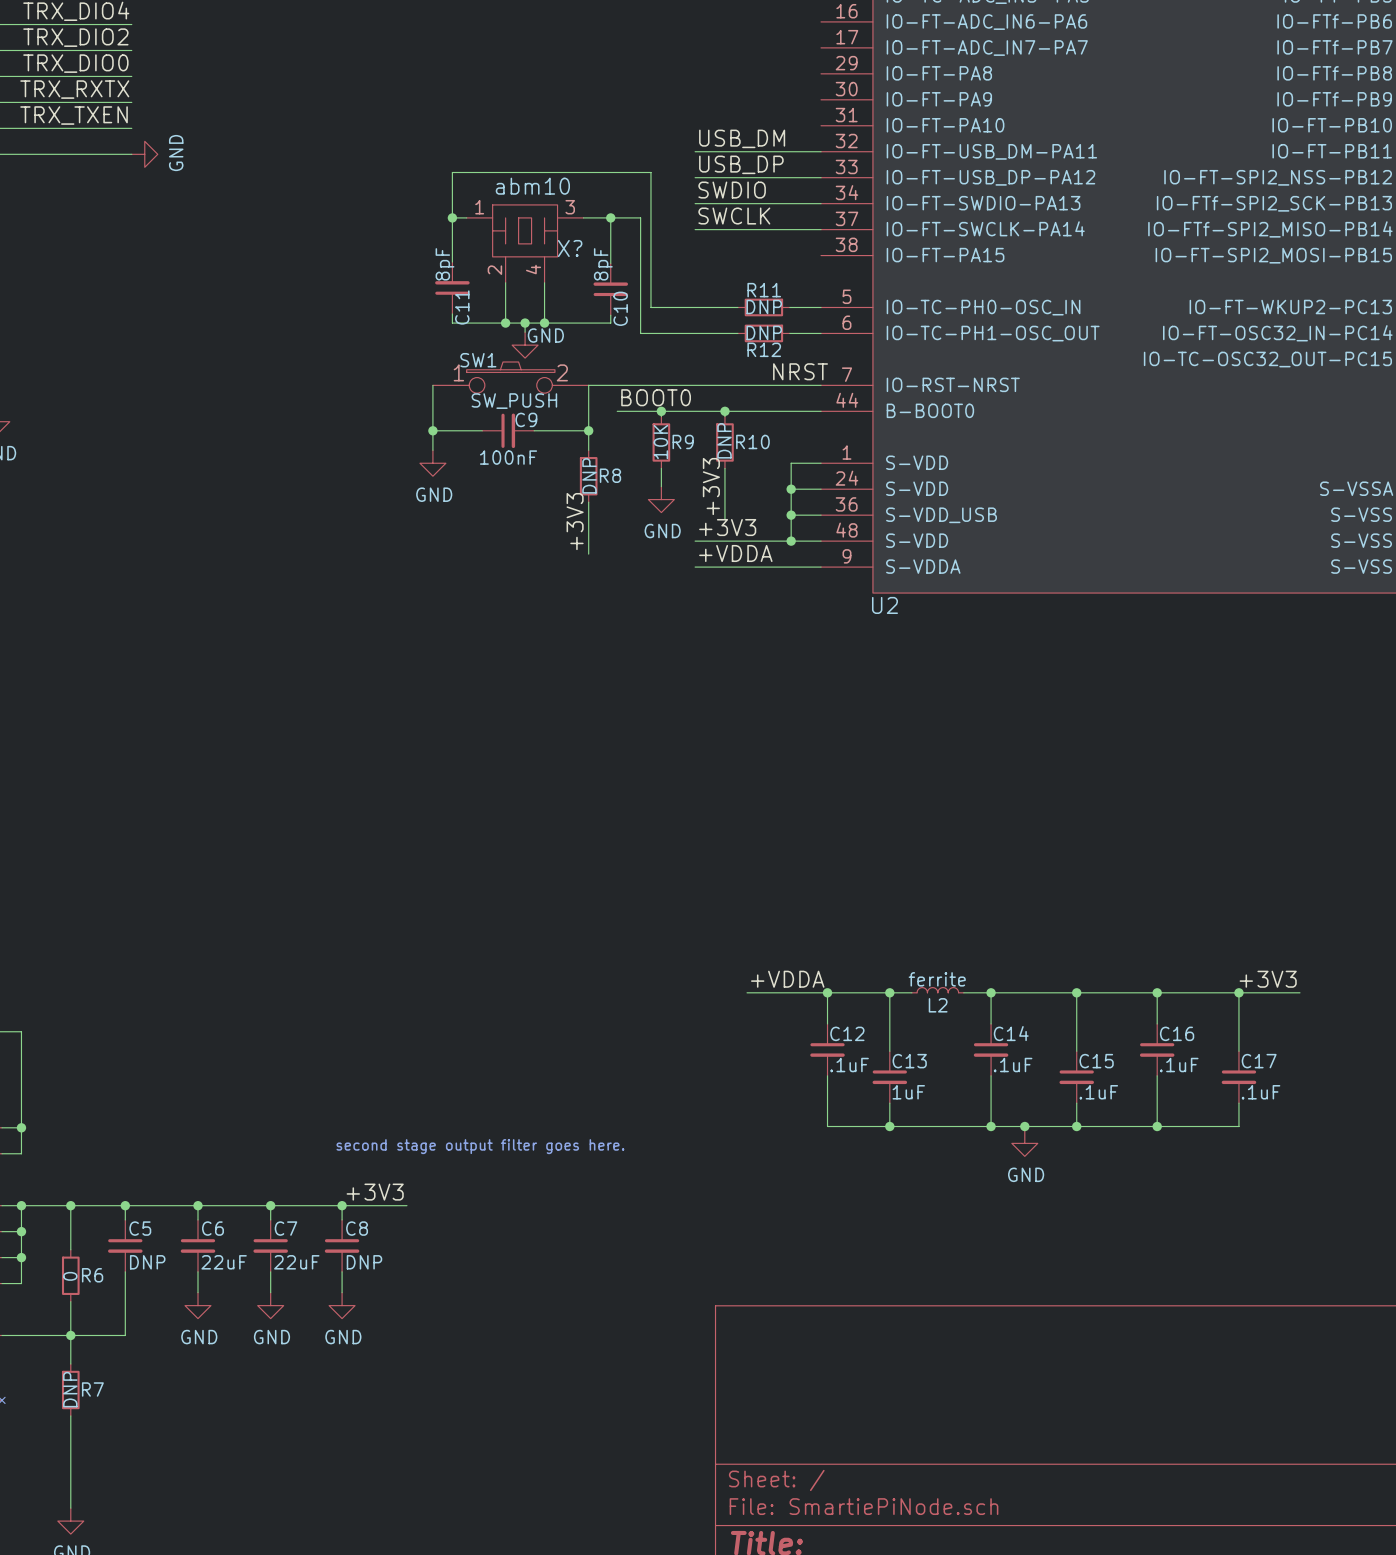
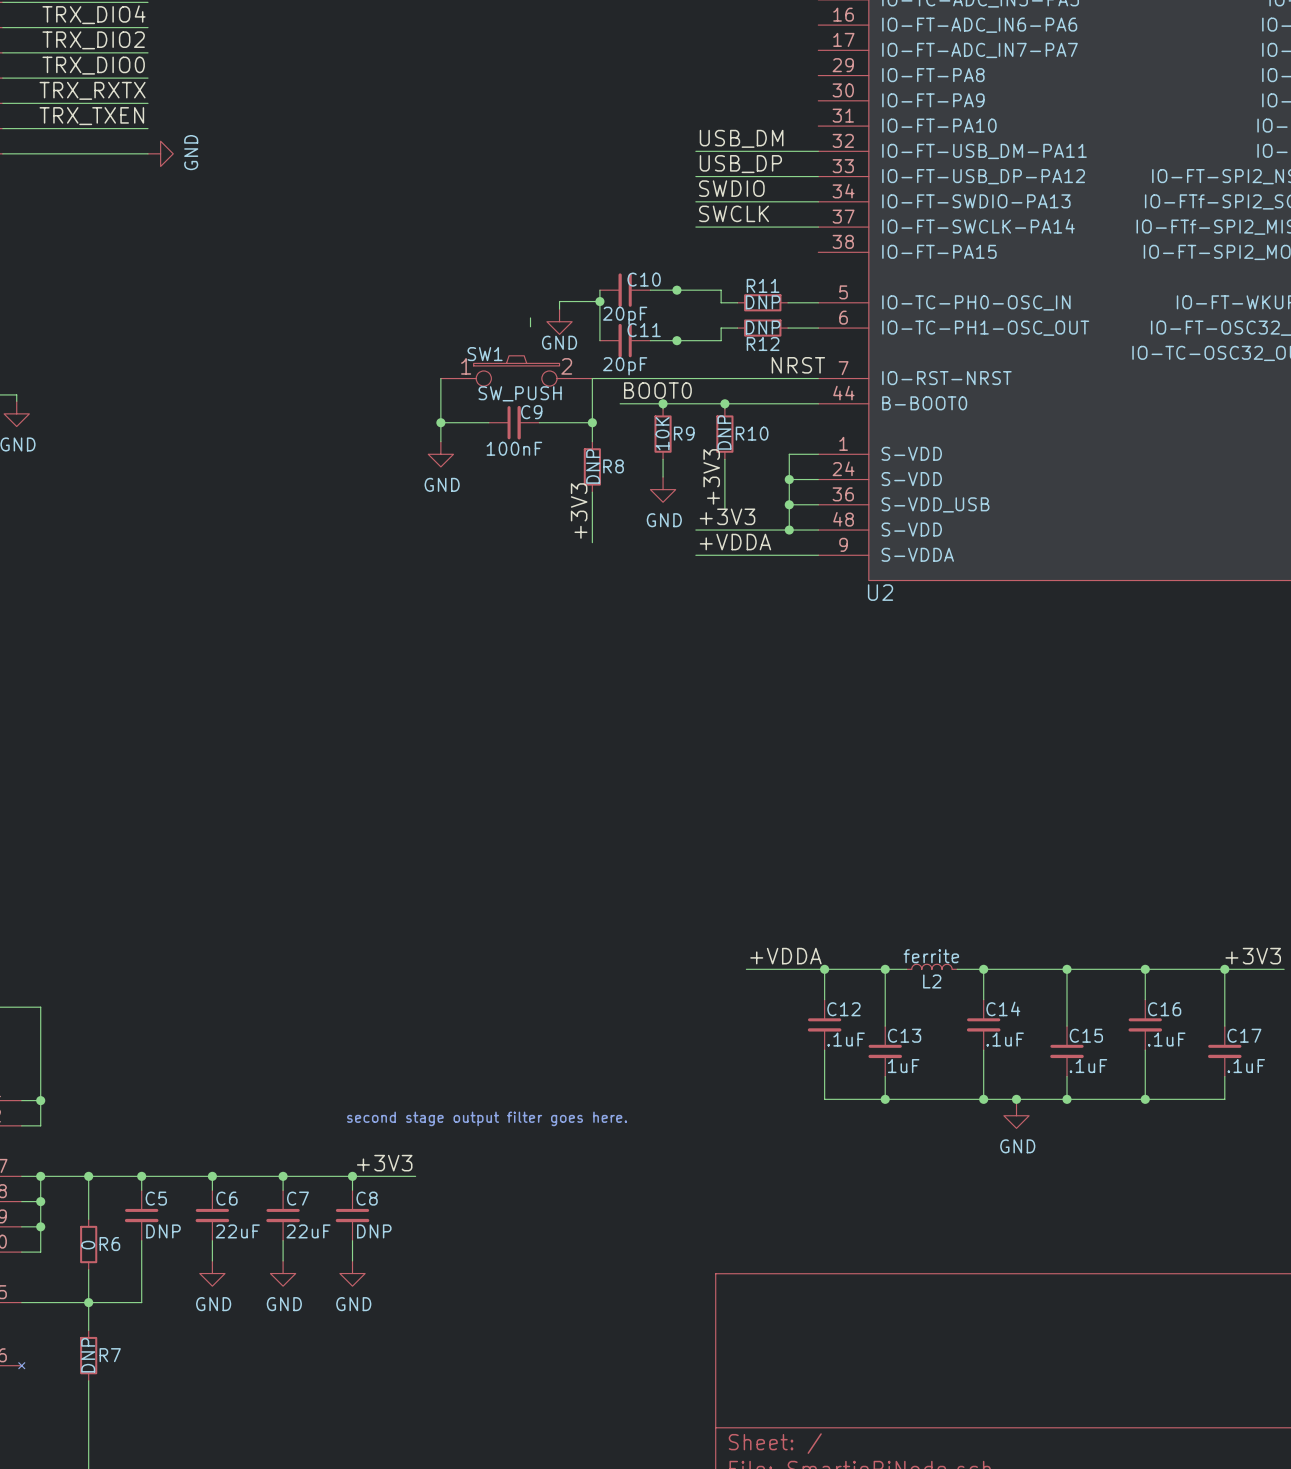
wire: (452, 217) (466, 217) -> none
junction: (452, 217) -> none
wire: (583, 217) (640, 217) (640, 333) (721, 333) -> (650, 340) (721, 340) (721, 328)
wire: (610, 217) (610, 263) -> none
junction: (610, 217) -> none
X?: abm10 (525, 243) -> none
wire: (452, 262) (452, 172) (650, 172) (650, 307) (721, 307) -> (650, 290) (721, 290) (721, 302)
C11 value: 8pF (444, 264) -> 20pF (625, 366)
C10 value: 8pF (603, 264) -> 20pF (625, 315)
wire: (505, 282) (505, 323) -> none
wire: (544, 282) (544, 323) -> none
C11 rotation: 0° (452, 287) -> 90° counterclockwise (625, 340)
C11 position: (452, 288) -> (625, 340)
C10 rotation: 0° (610, 289) -> 90° counterclockwise (625, 290)
wire: none -> (599, 290) (599, 340)
junction: none -> (676, 290)
wire: none -> (599, 301) (559, 301) (559, 309)
junction: none -> (599, 301)
wire: (452, 313) (452, 323) (610, 323) (610, 315) -> none
junction: (505, 323) -> none
junction: (525, 323) -> none
junction: (544, 323) -> none
power symbol text position: GND (545, 335) -> GND (559, 342)
power symbol position: GND (525, 345) -> GND (559, 321)
junction: none -> (676, 340)

